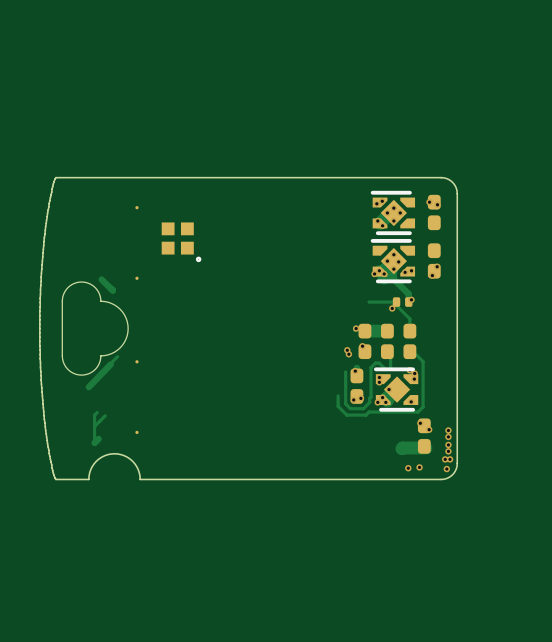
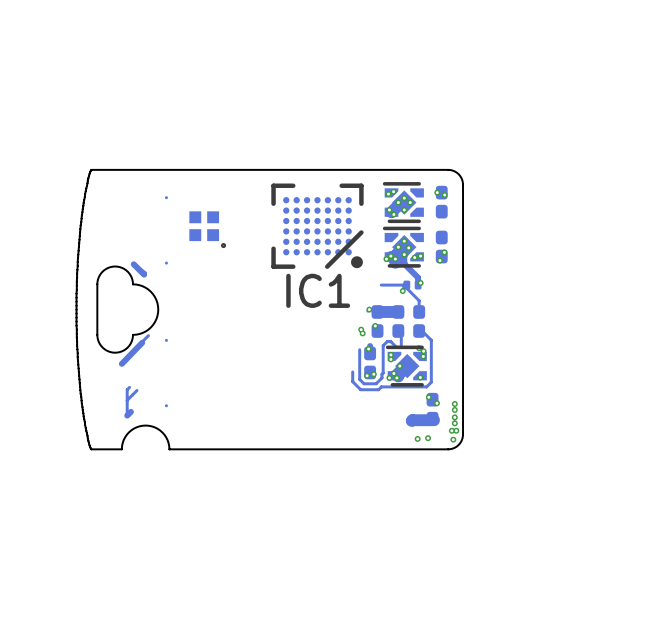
IC1: none -> (317, 226)

